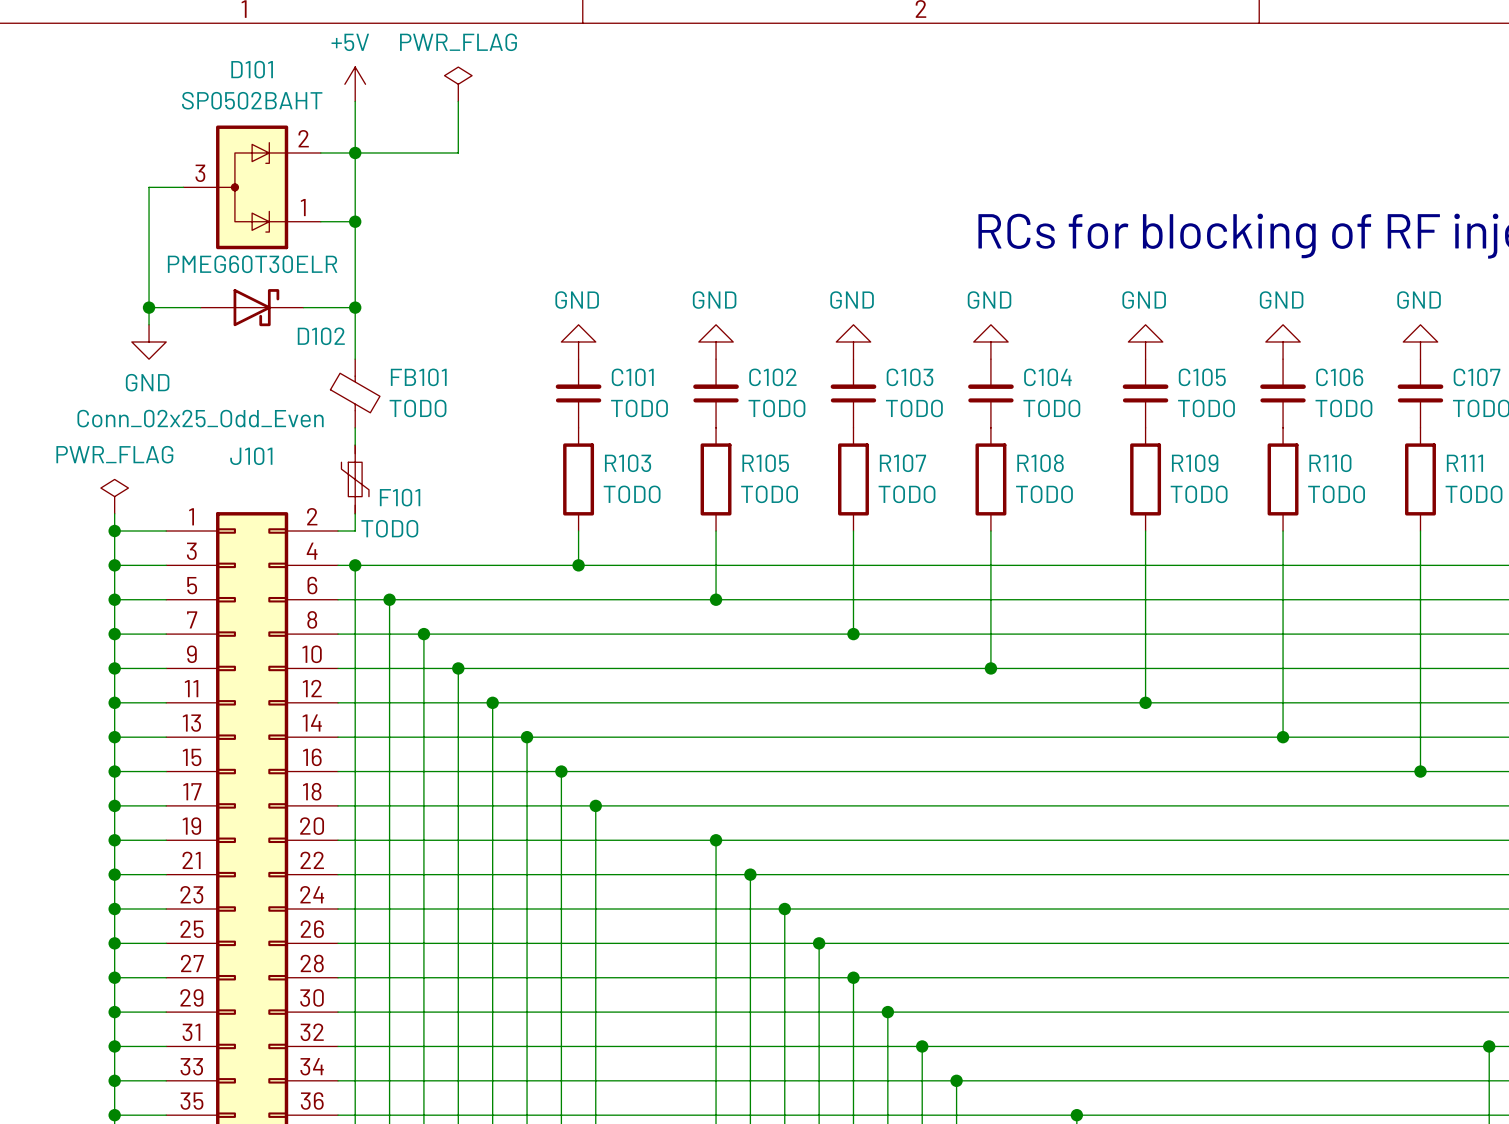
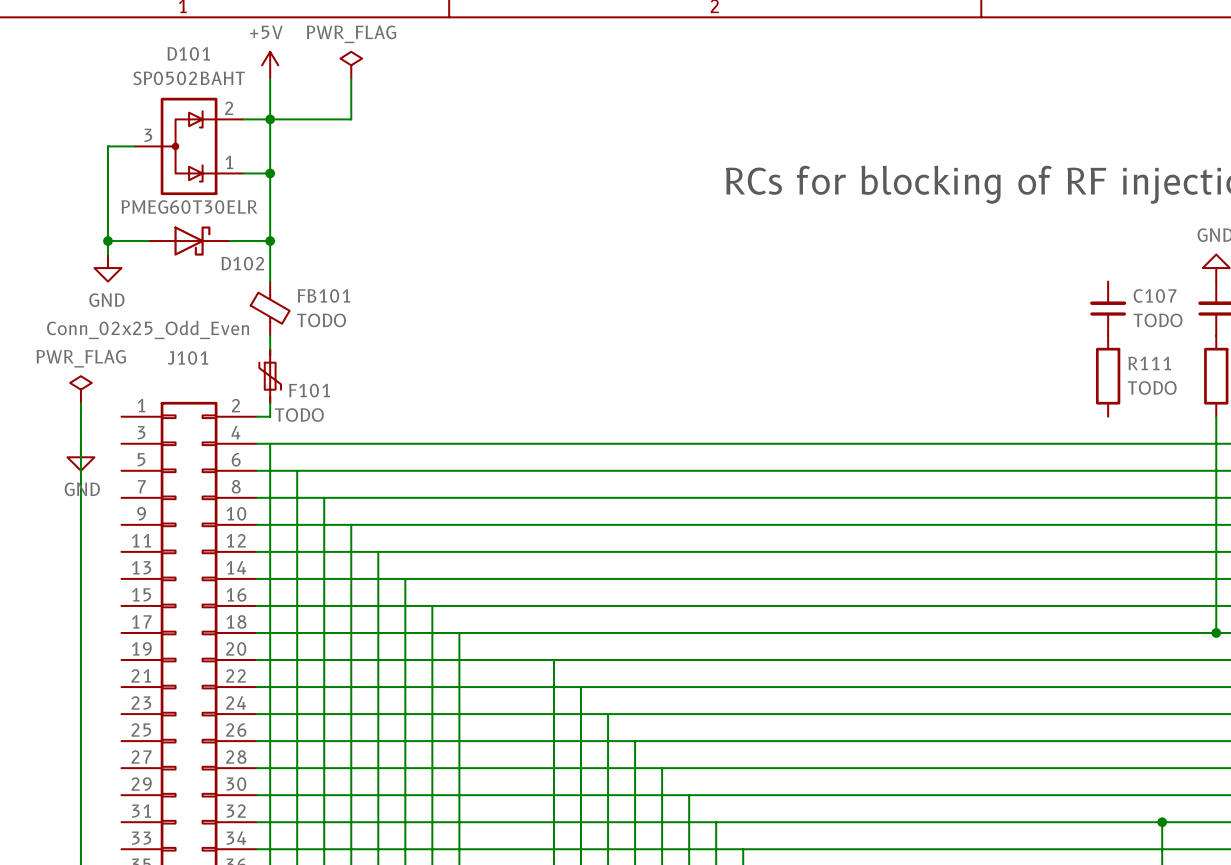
power symbol: GND (578, 341) -> none
power symbol: GND (716, 341) -> none
power symbol: GND (853, 341) -> none
power symbol: GND (990, 341) -> none
power symbol: GND (1145, 341) -> none
power symbol: GND (1283, 341) -> none
power symbol: GND (1420, 341) -> none
C101: TODO (578, 393) -> none
C102: TODO (716, 393) -> none
C103: TODO (853, 393) -> none
C104: TODO (990, 393) -> none
C105: TODO (1145, 393) -> none
C106: TODO (1283, 393) -> none
R103: TODO (578, 479) -> none
R105: TODO (716, 479) -> none
R107: TODO (853, 479) -> none
R108: TODO (990, 479) -> none
R109: TODO (1145, 479) -> none
R110: TODO (1283, 479) -> none
wire: (114, 530) (166, 530) -> none
junction: (114, 530) -> none
wire: (578, 530) (578, 565) -> none
wire: (716, 530) (716, 599) -> none
wire: (853, 530) (853, 634) -> none
wire: (990, 530) (990, 668) -> none
wire: (1145, 530) (1145, 702) -> none
wire: (1283, 530) (1283, 737) -> none
wire: (1420, 530) (1420, 771) -> none
wire: (114, 565) (166, 565) -> none
junction: (114, 565) -> none
junction: (355, 565) -> none
junction: (578, 565) -> none
power symbol: none -> GND (80, 457)
wire: (114, 599) (166, 599) -> none
junction: (114, 599) -> none
junction: (389, 599) -> none
junction: (716, 599) -> none
wire: (114, 634) (166, 634) -> none
junction: (114, 634) -> none
junction: (423, 634) -> none
junction: (853, 634) -> none
wire: (114, 668) (166, 668) -> none
junction: (114, 668) -> none
junction: (458, 668) -> none
junction: (990, 668) -> none
wire: (114, 702) (166, 702) -> none
junction: (114, 702) -> none
junction: (492, 702) -> none
junction: (1145, 702) -> none
wire: (114, 737) (166, 737) -> none
junction: (114, 737) -> none
junction: (527, 737) -> none
junction: (1283, 737) -> none
wire: (114, 771) (166, 771) -> none
junction: (114, 771) -> none
junction: (561, 771) -> none
junction: (1420, 771) -> none
wire: (114, 805) (166, 805) -> none
junction: (114, 805) -> none
junction: (595, 805) -> none
wire: (114, 840) (166, 840) -> none
junction: (114, 840) -> none
junction: (716, 840) -> none
wire: (114, 874) (166, 874) -> none
junction: (114, 874) -> none
junction: (750, 874) -> none
wire: (114, 909) (166, 909) -> none
junction: (114, 909) -> none
junction: (784, 909) -> none
wire: (114, 943) (166, 943) -> none
junction: (114, 943) -> none
junction: (819, 943) -> none
wire: (114, 977) (166, 977) -> none
junction: (114, 977) -> none
junction: (853, 977) -> none
wire: (114, 1012) (166, 1012) -> none
junction: (114, 1012) -> none
junction: (887, 1012) -> none
wire: (114, 1046) (166, 1046) -> none
junction: (114, 1046) -> none
junction: (922, 1046) -> none
wire: (114, 1080) (166, 1080) -> none
junction: (114, 1080) -> none
junction: (956, 1080) -> none

